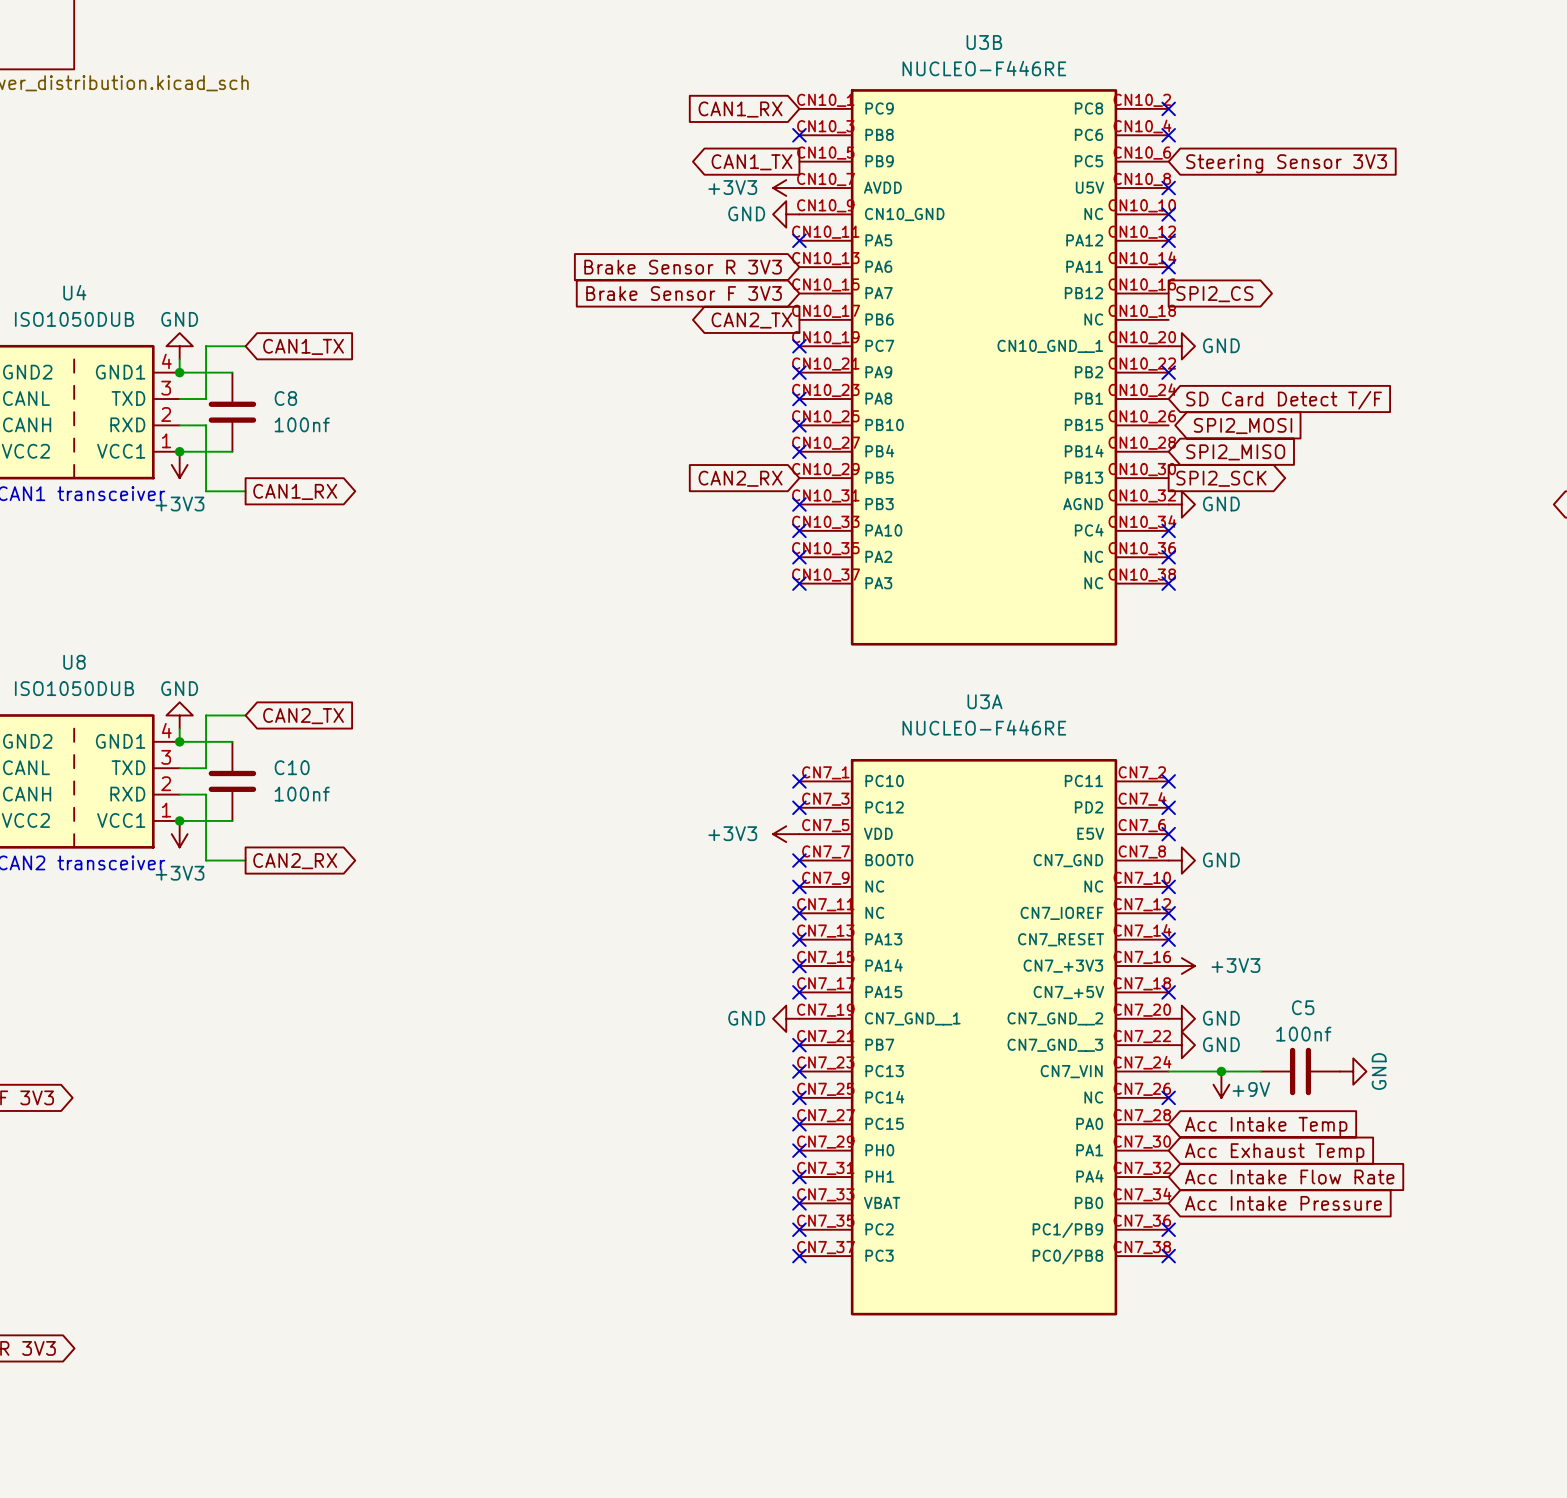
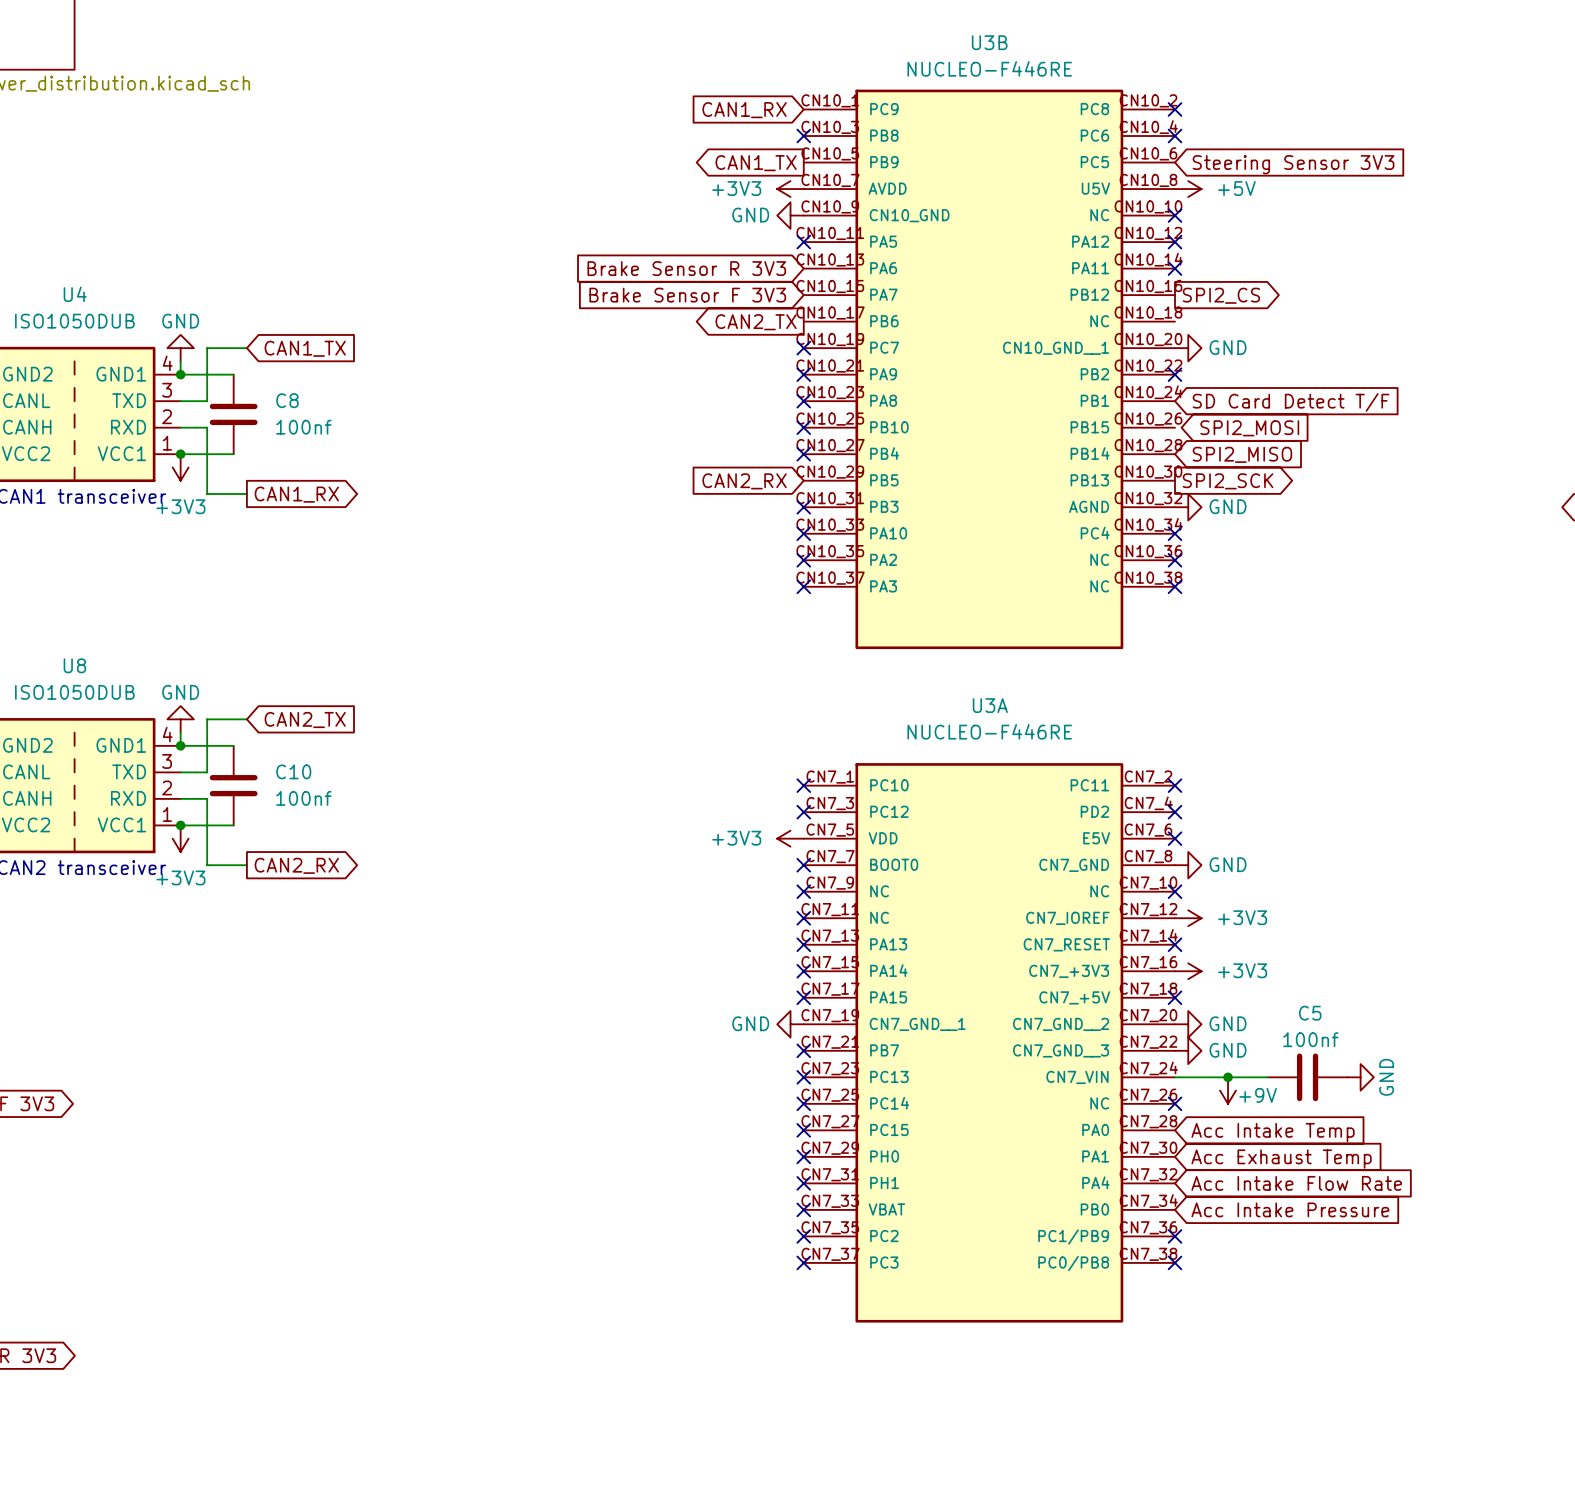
no-connect mark: (1168, 188) -> none
power symbol: none -> +5V (1188, 189)
no-connect mark: (1168, 913) -> none
power symbol: none -> +3V3 (1188, 918)

